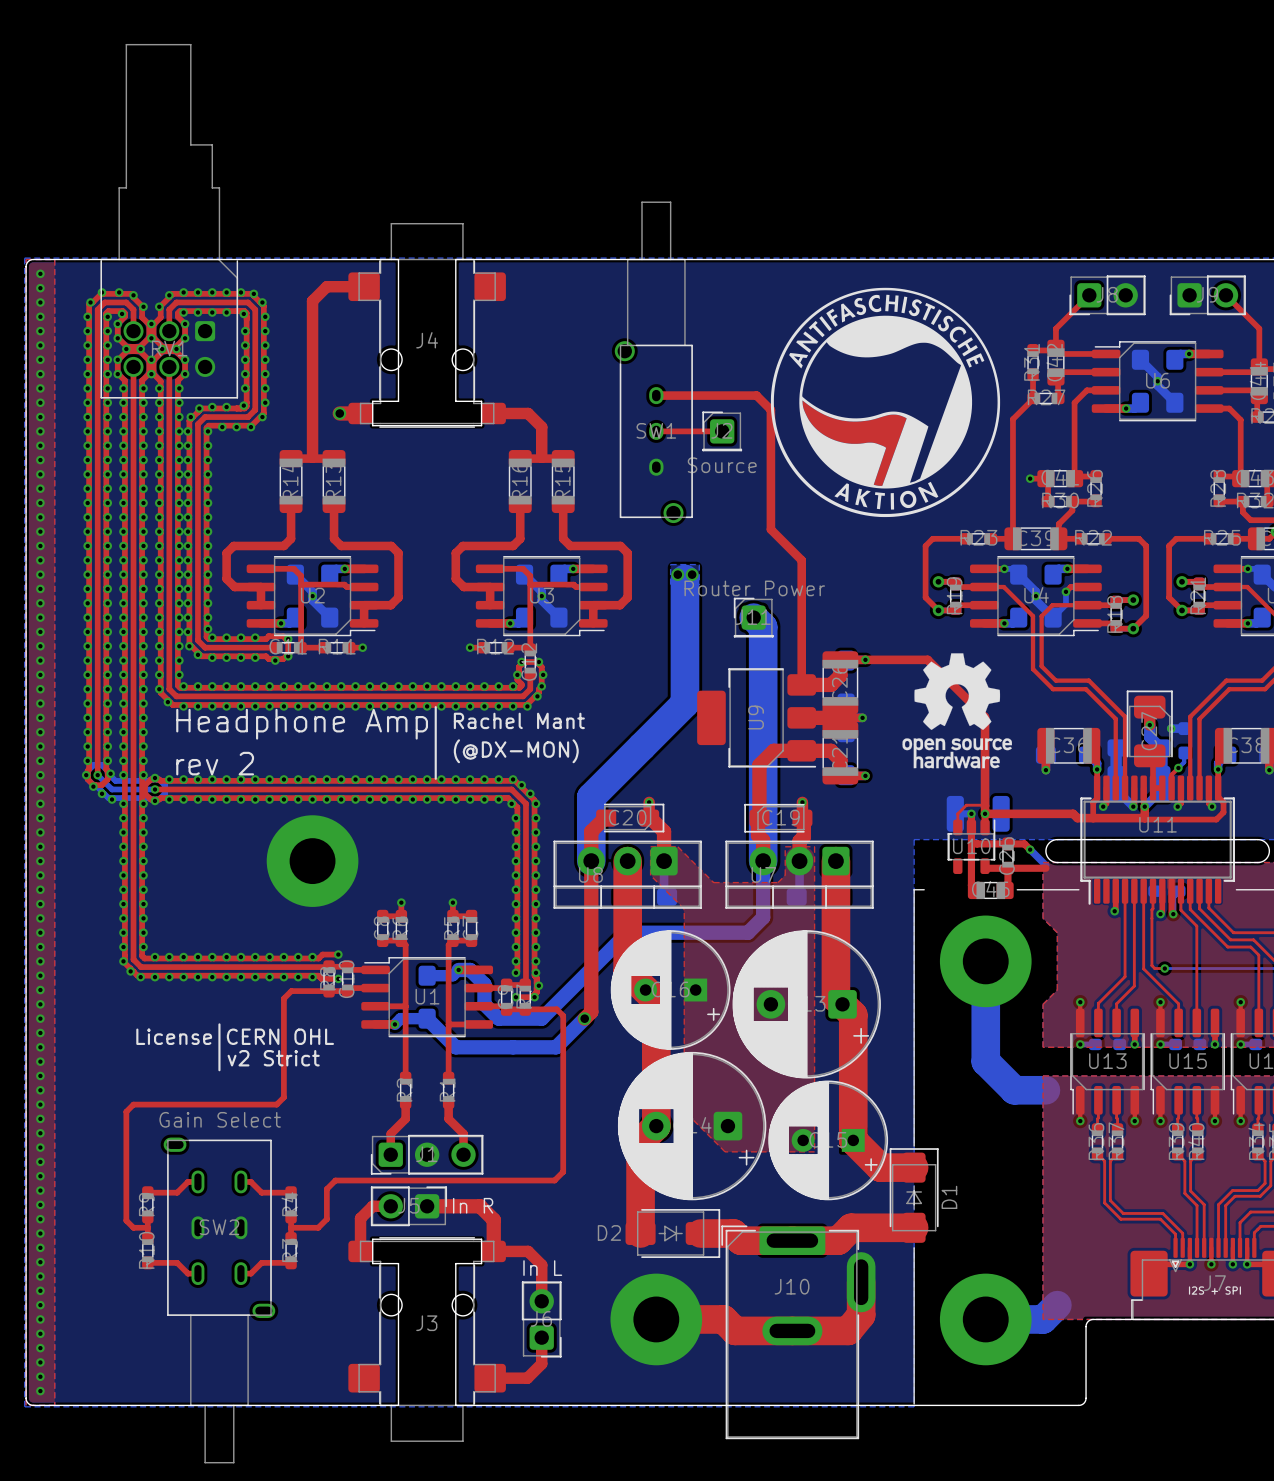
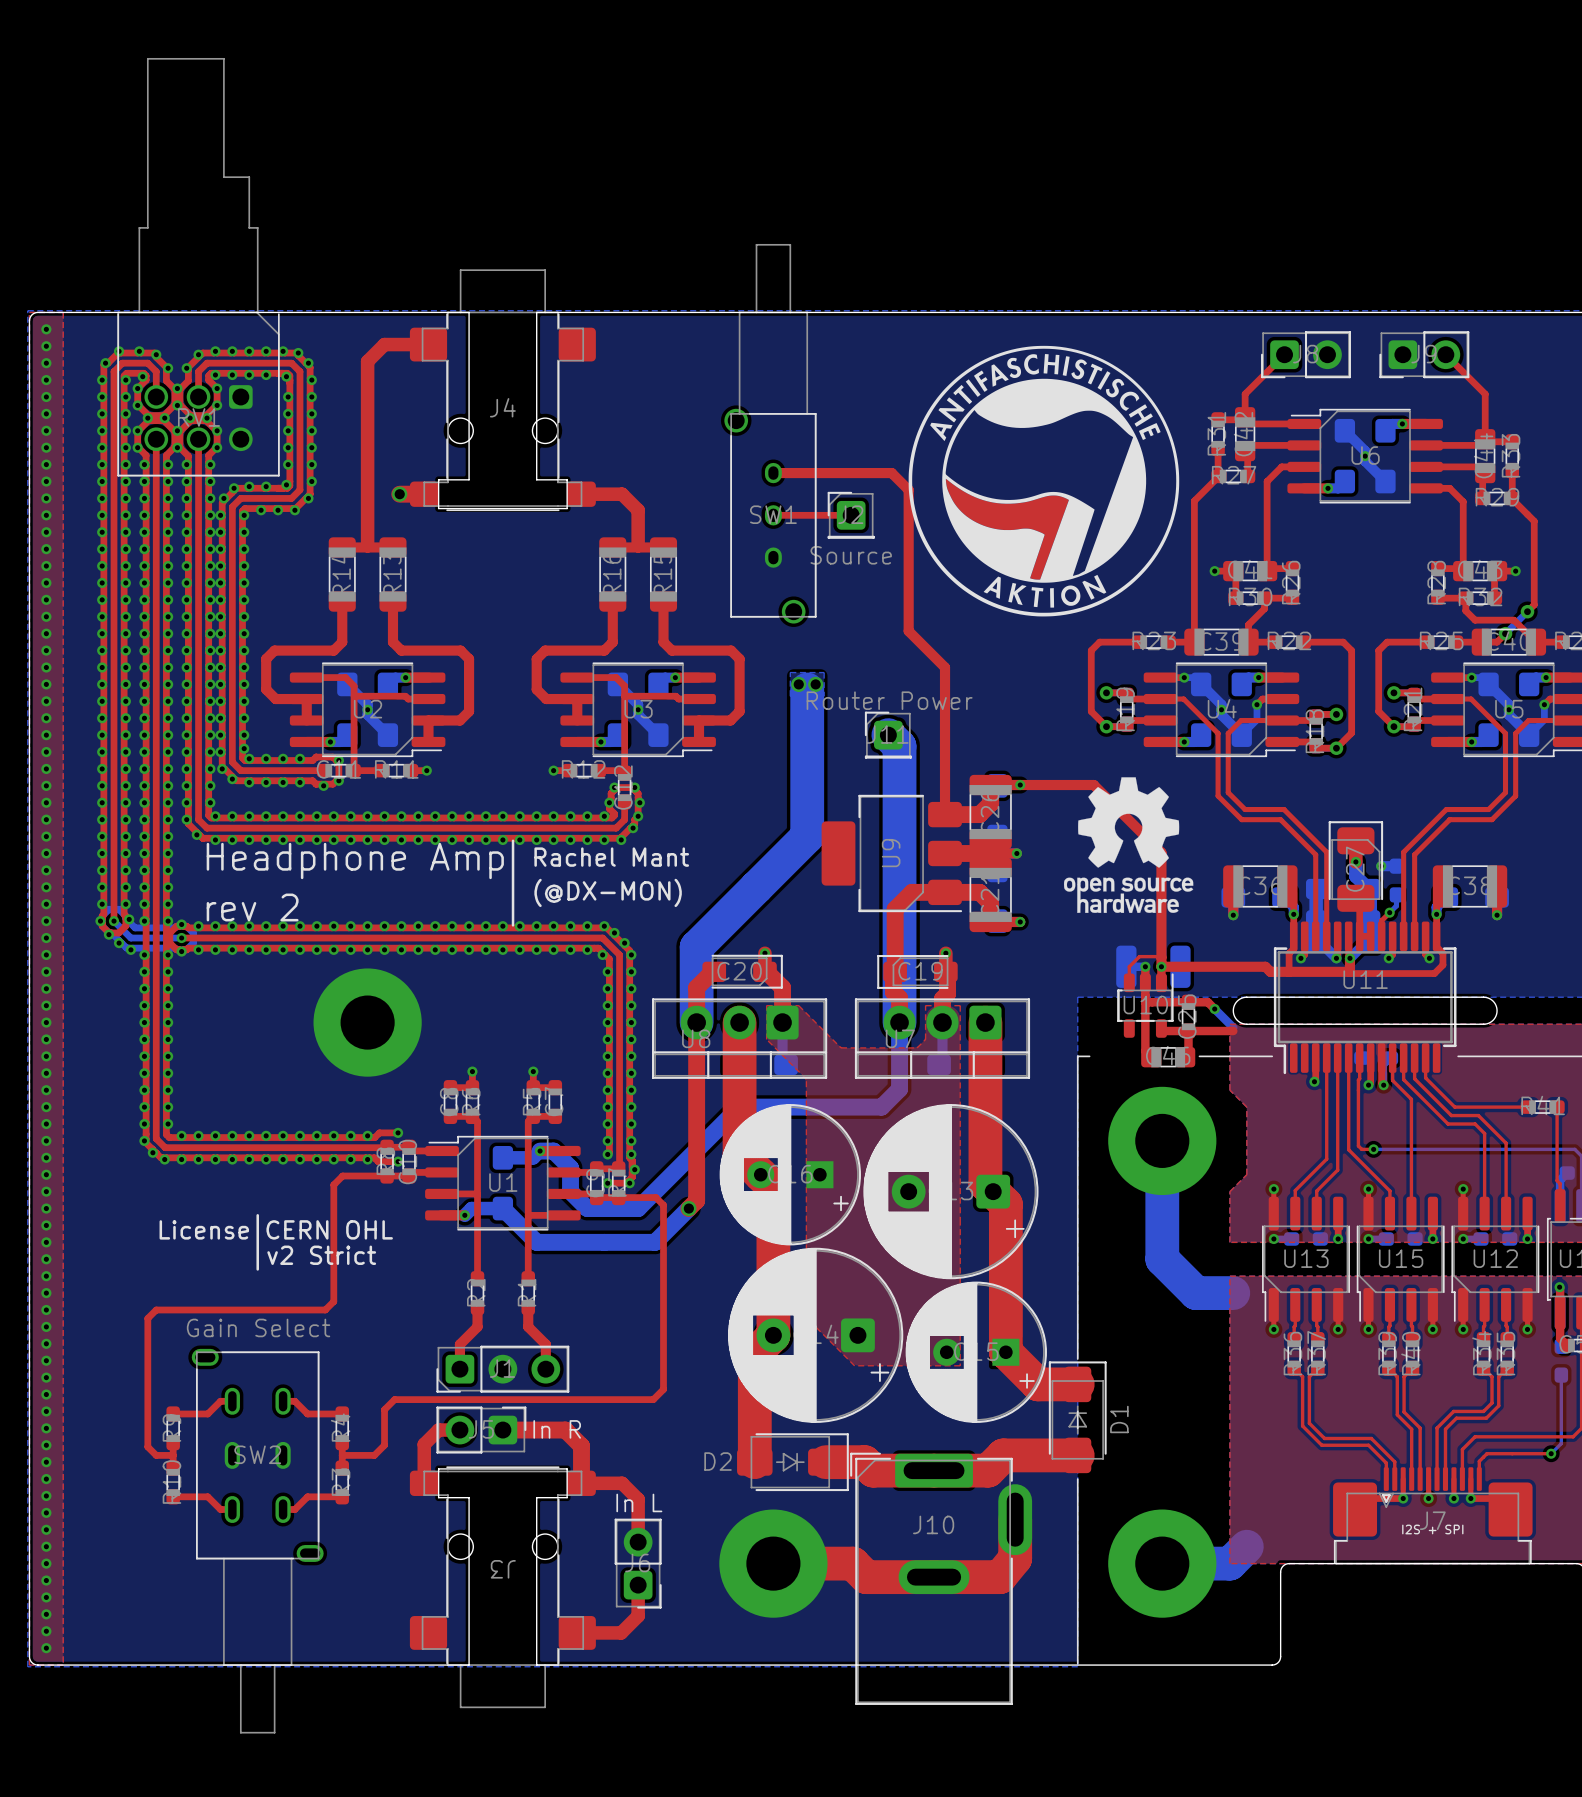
J3 name rotation: 0° (426, 1323) -> 180° (503, 1569)

